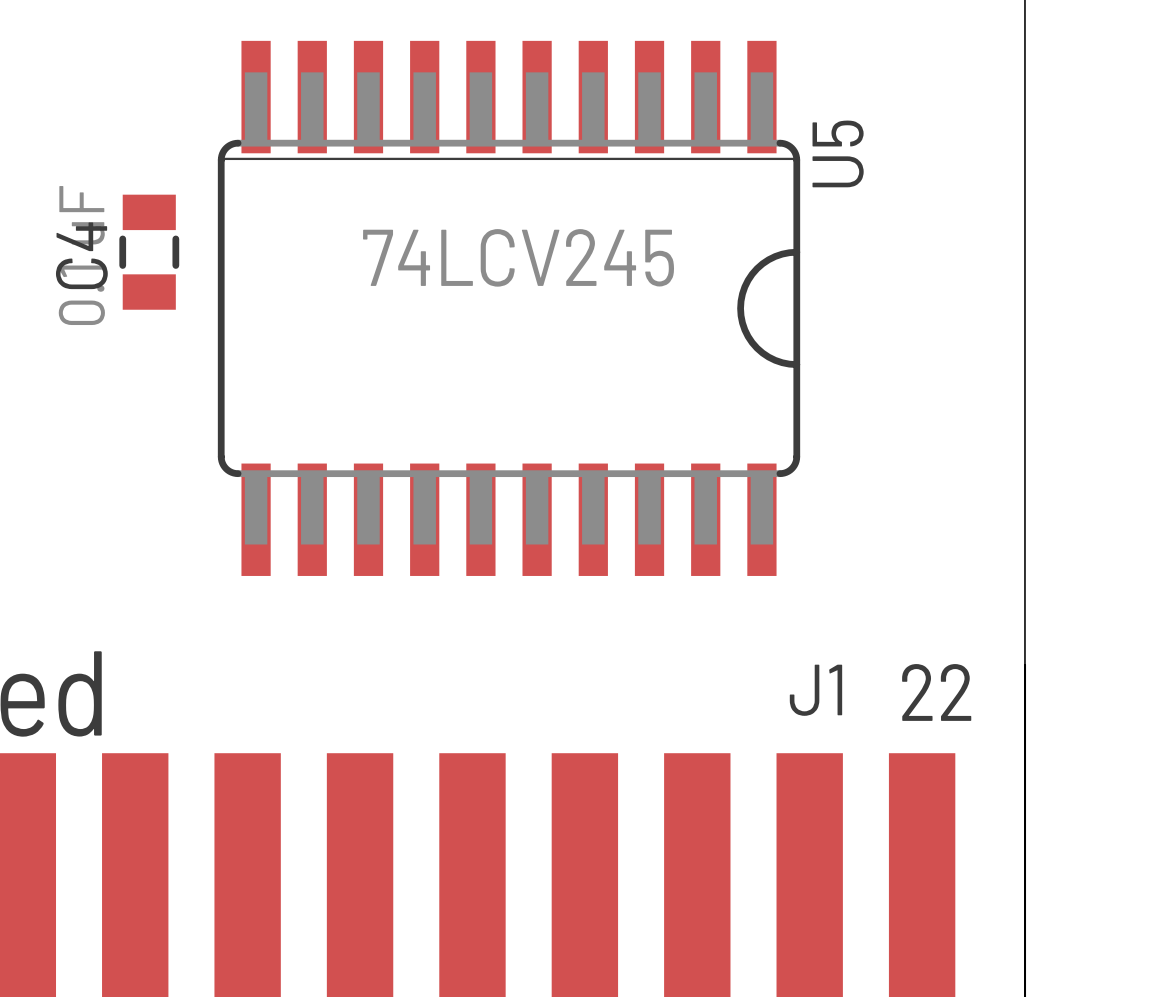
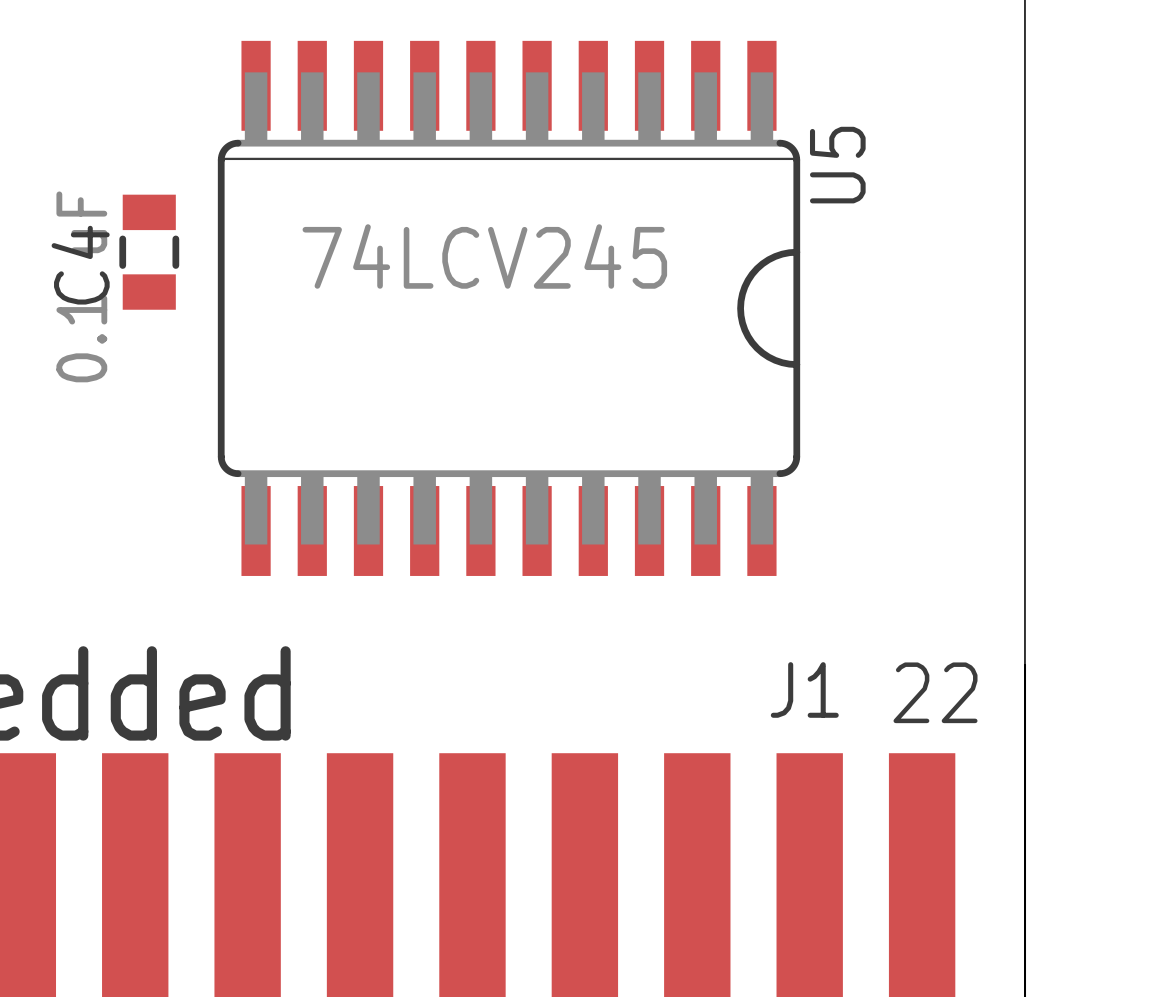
U5 footprint: [217, 40, 801, 576] -> [217, 40, 801, 576]

